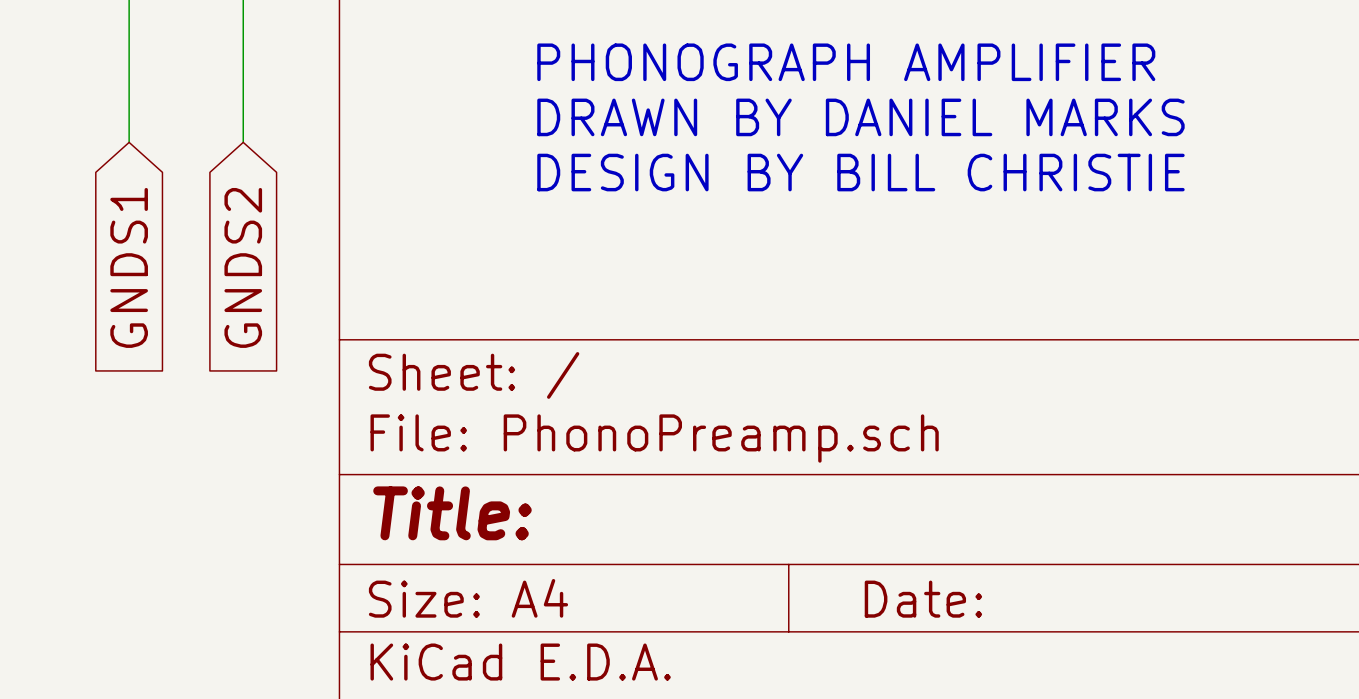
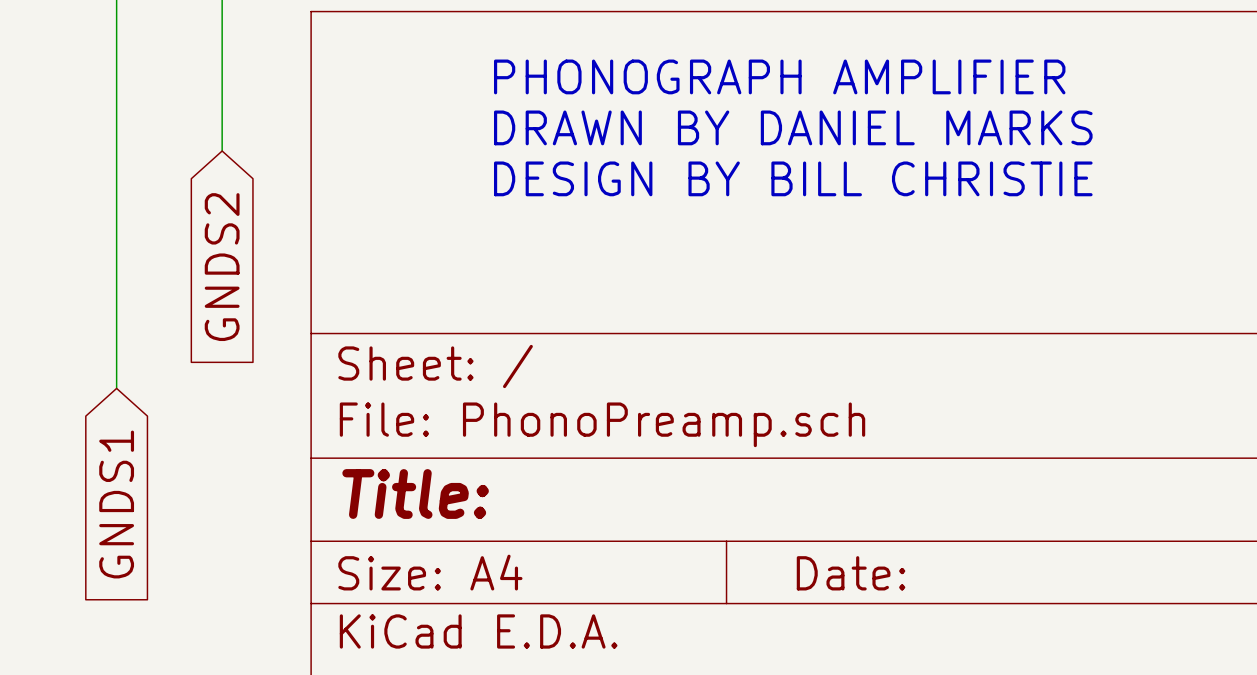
wire: none -> (116, 151) (116, 388)
global label position: GNDS1 (129, 267) -> GNDS1 (116, 504)

